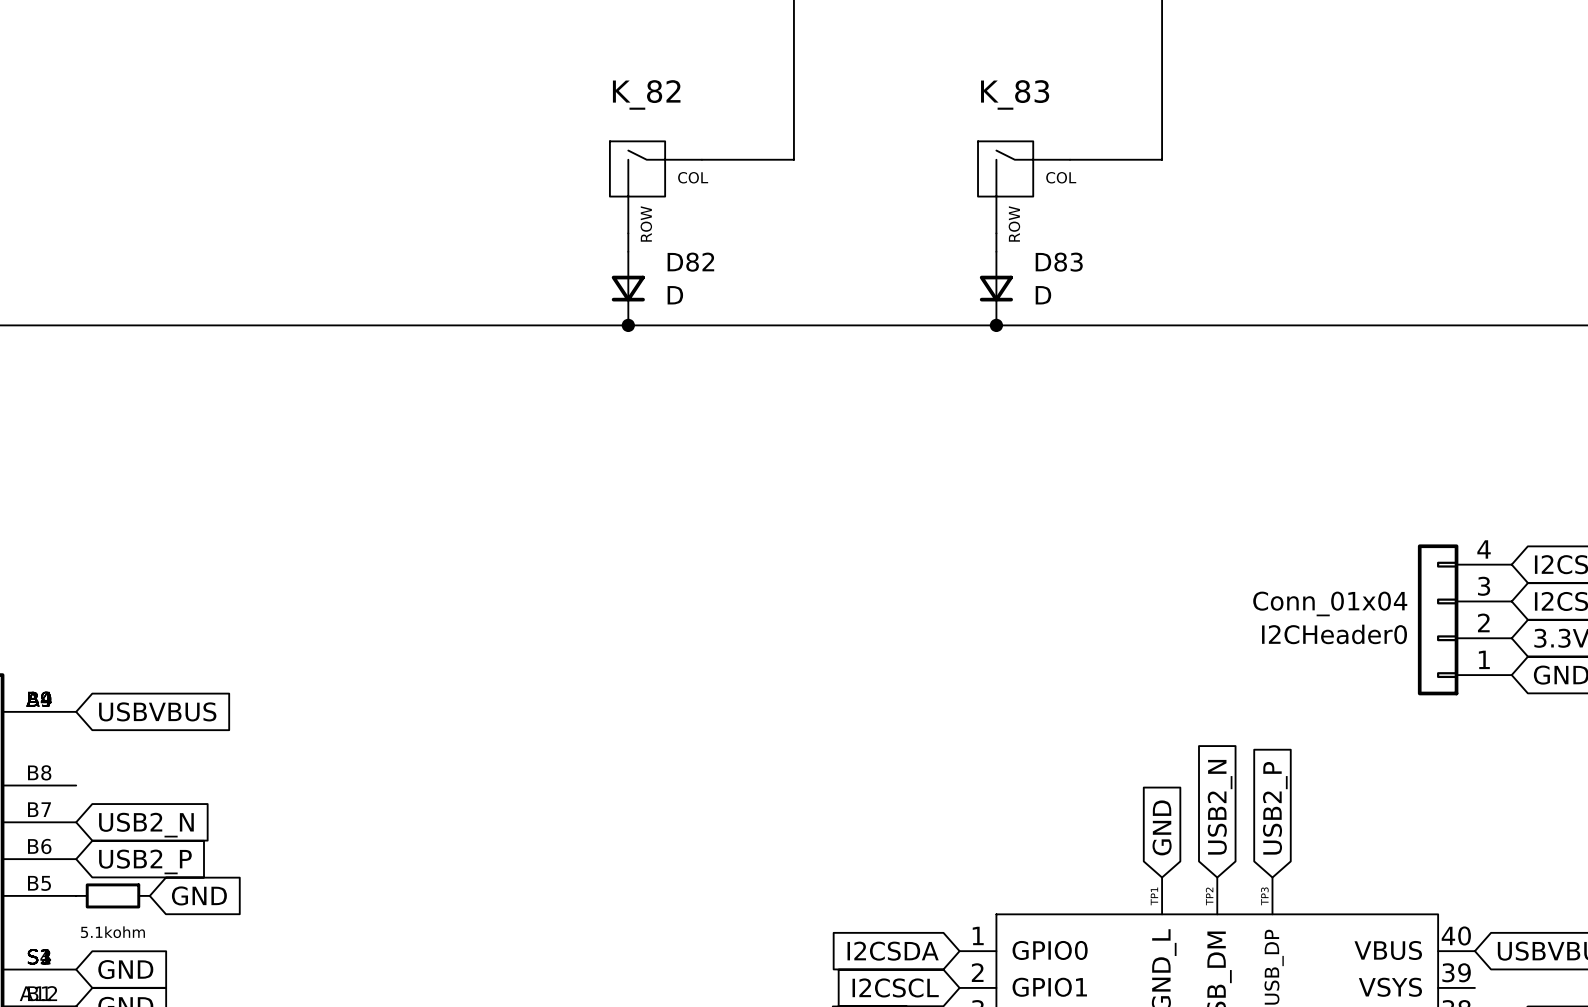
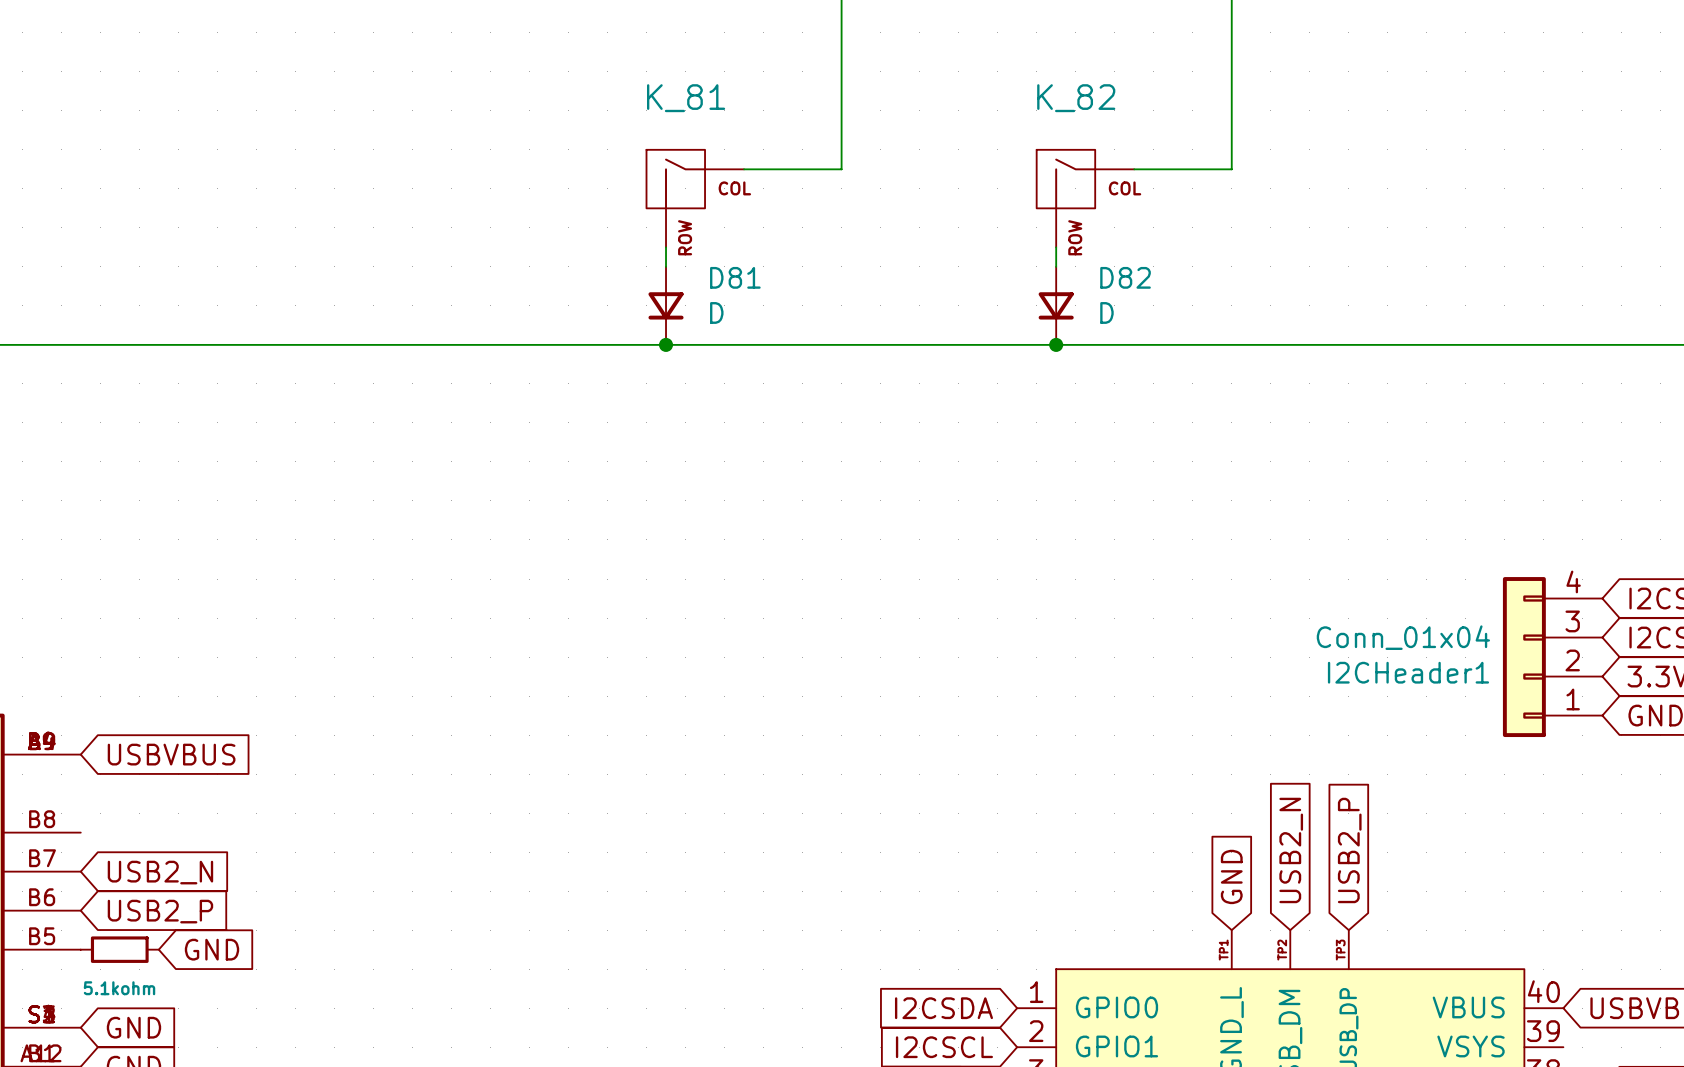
K_82 name: K_82 (646, 94) -> K_81 (686, 98)
K_83 name: K_83 (1015, 94) -> K_82 (1076, 98)
D82 name: D82 (690, 262) -> D81 (735, 277)
D83 name: D83 (1059, 262) -> D82 (1125, 277)
I2CHeader0 name: I2CHeader0 (1334, 634) -> I2CHeader1 (1408, 672)

